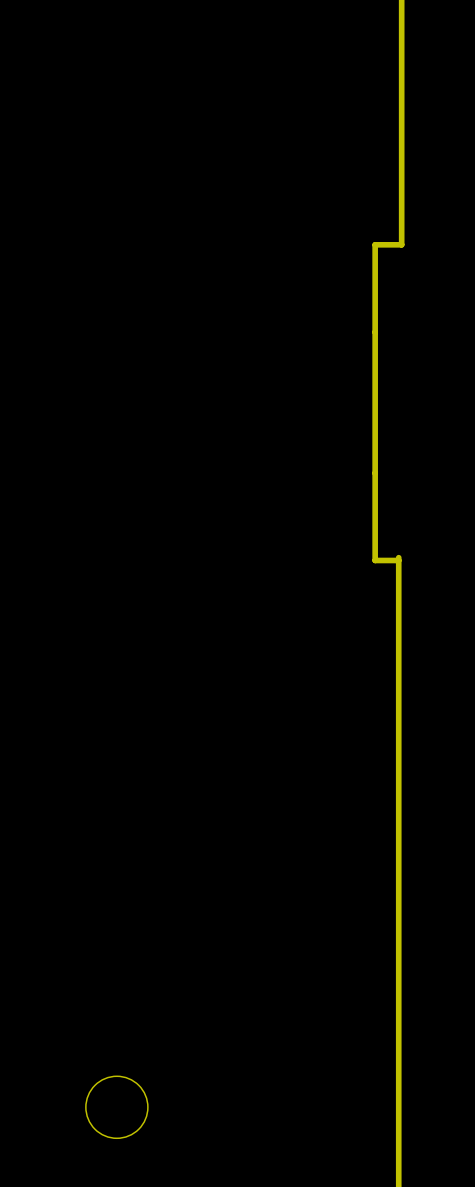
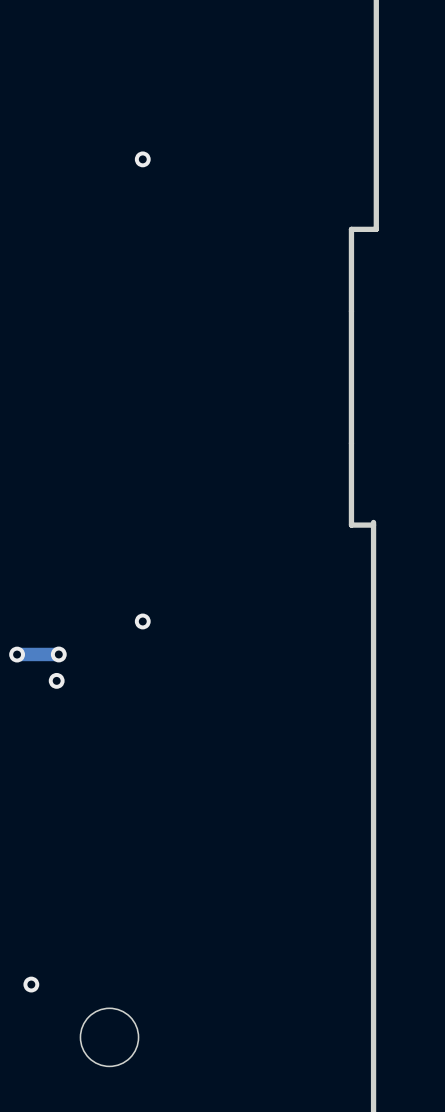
via: none -> (142, 159)
via: none -> (142, 621)
via: none -> (17, 654)
track: none -> (58, 654) (17, 654)
via: none -> (58, 654)
via: none -> (56, 680)
via: none -> (31, 984)

